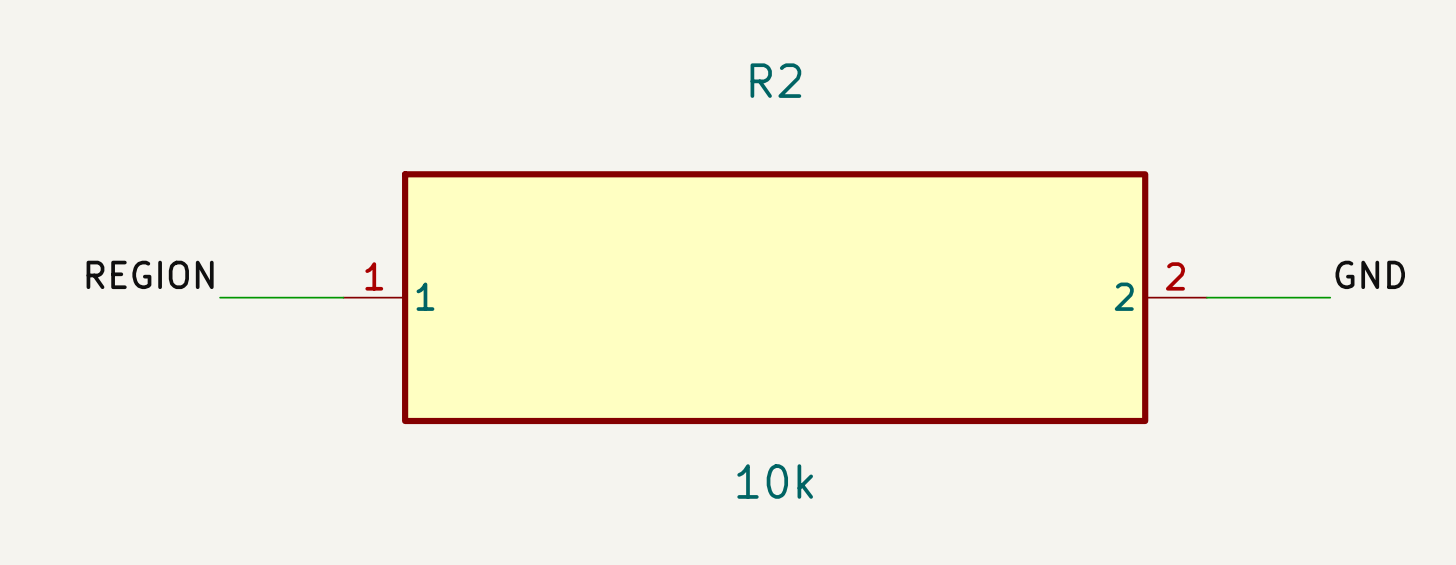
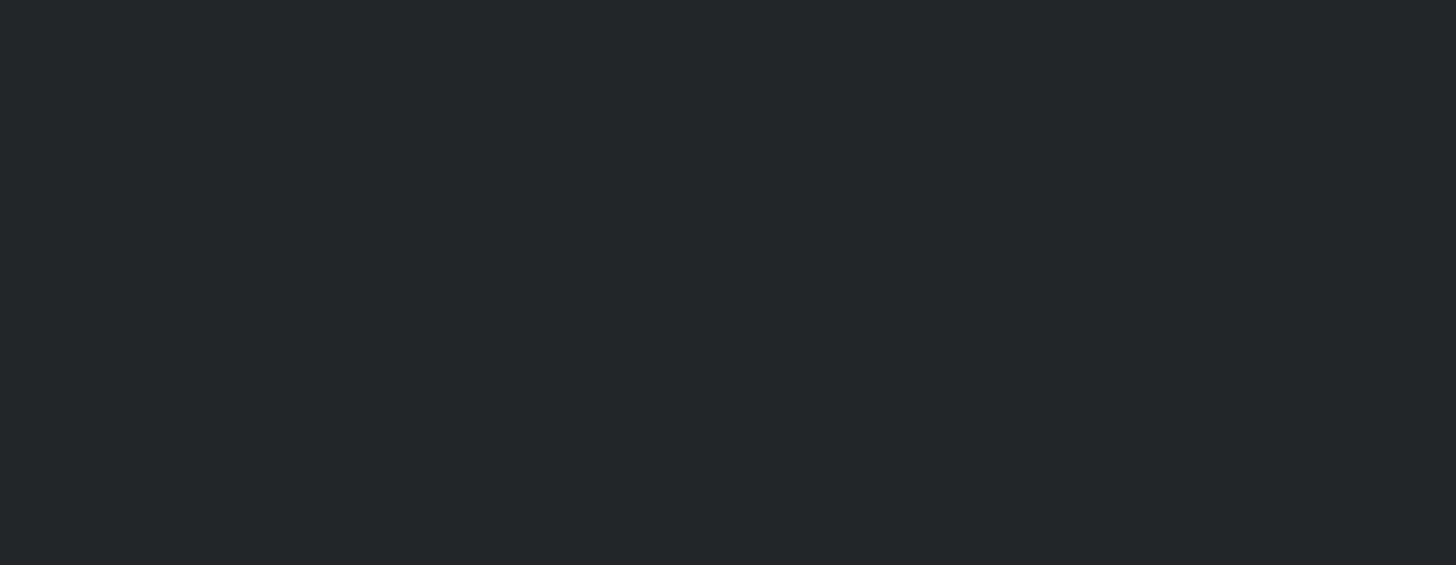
label: REGION (150, 274) -> none
label: GND (1370, 274) -> none
wire: (220, 297) (343, 297) -> none
R2: 10k (775, 297) -> none
wire: (1206, 297) (1330, 297) -> none

